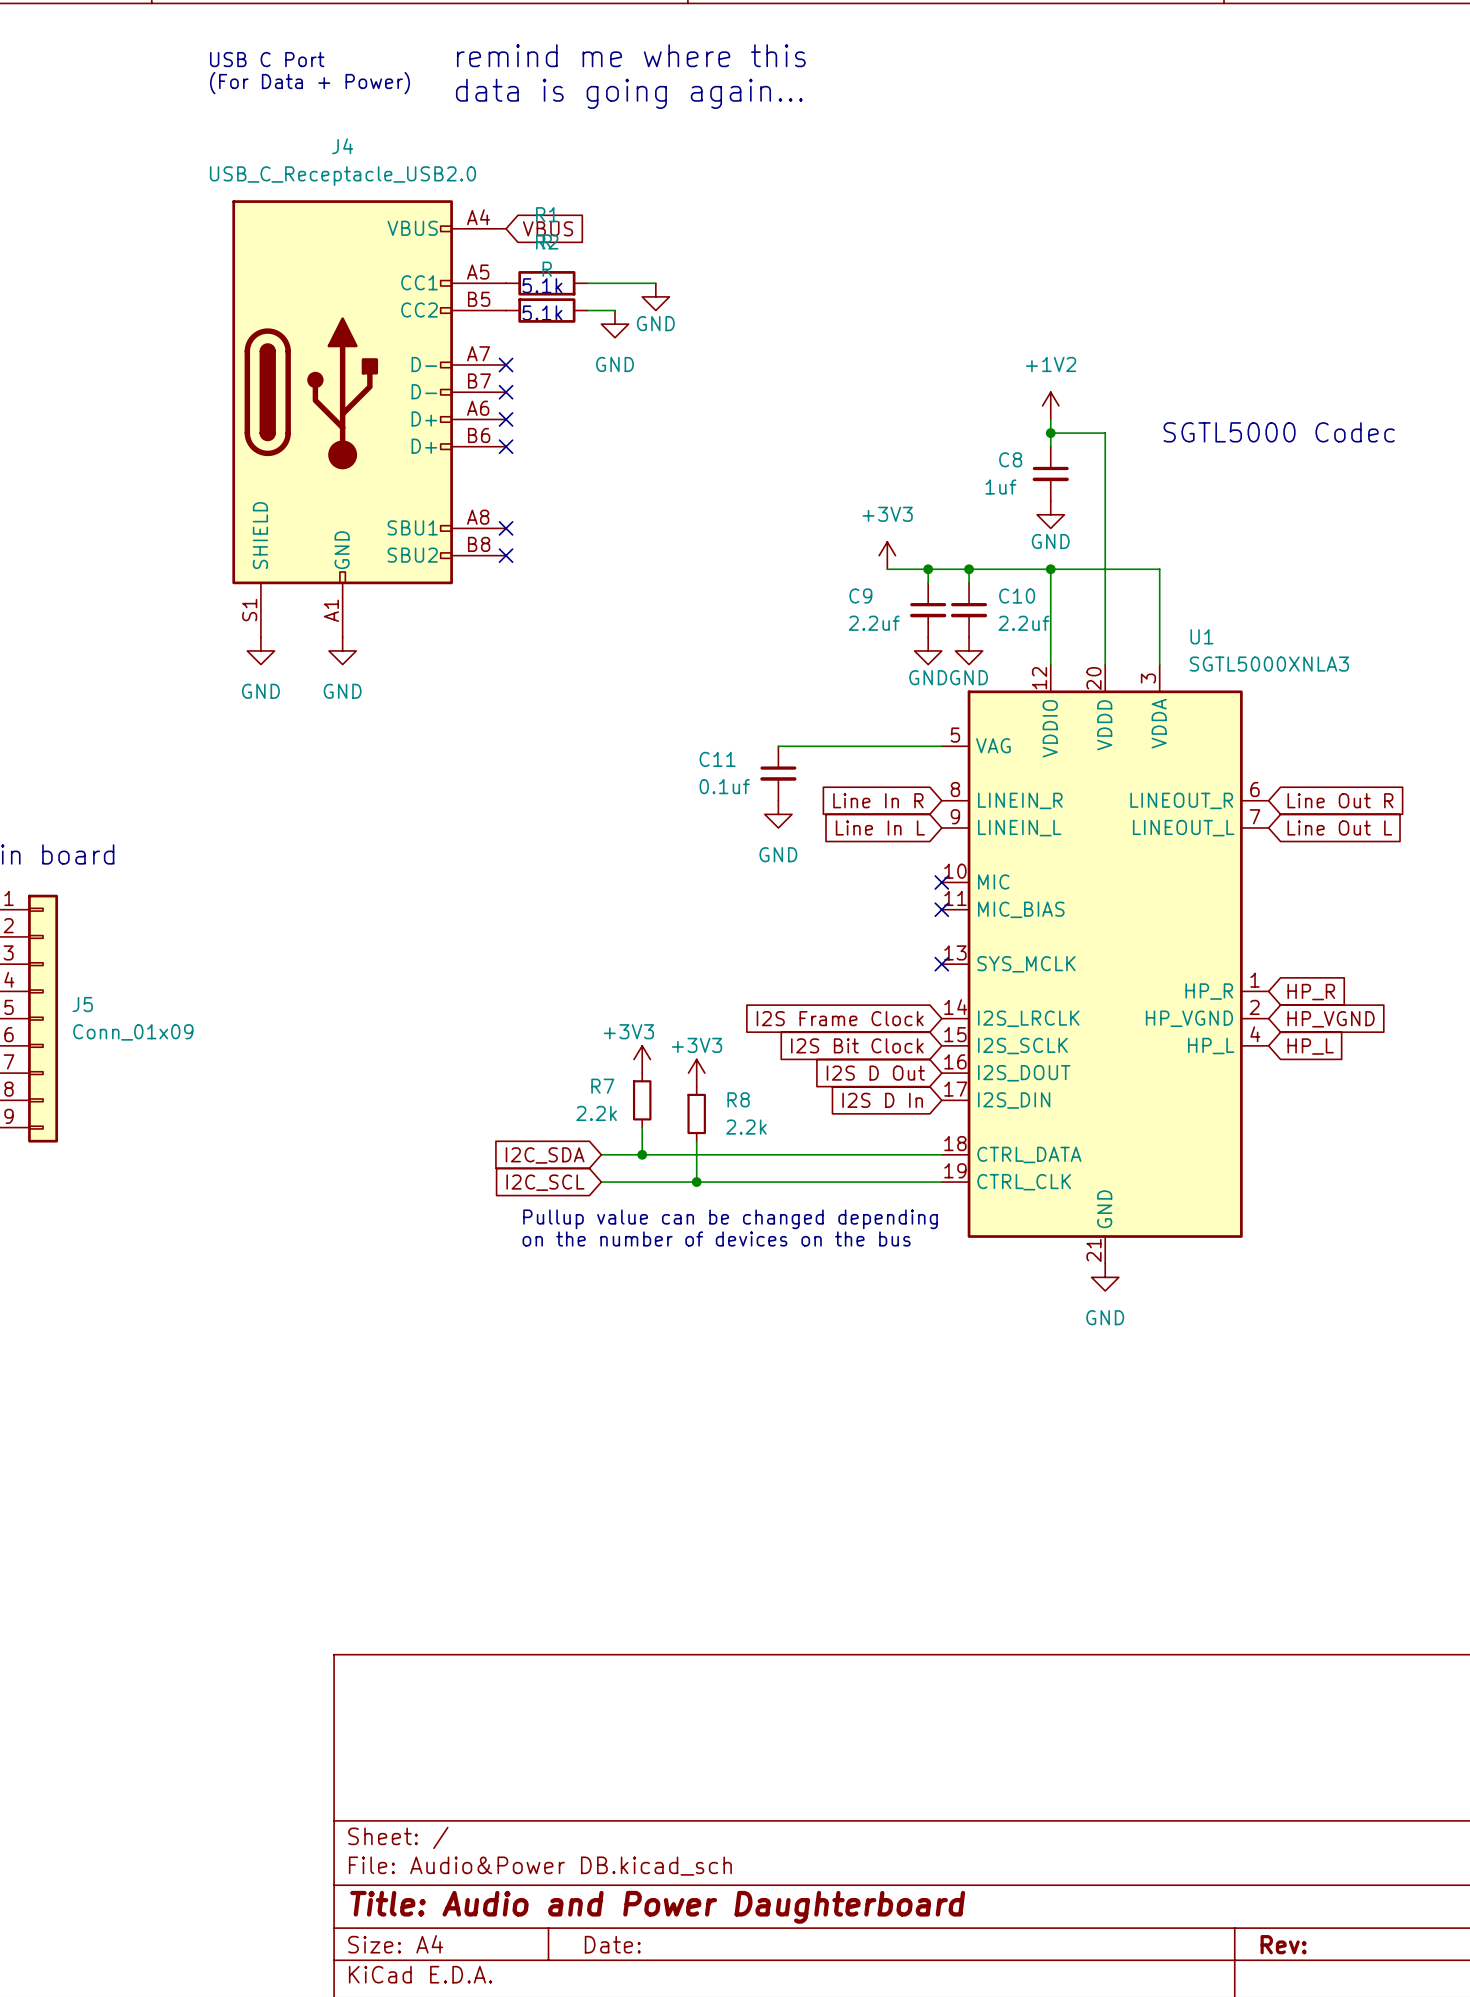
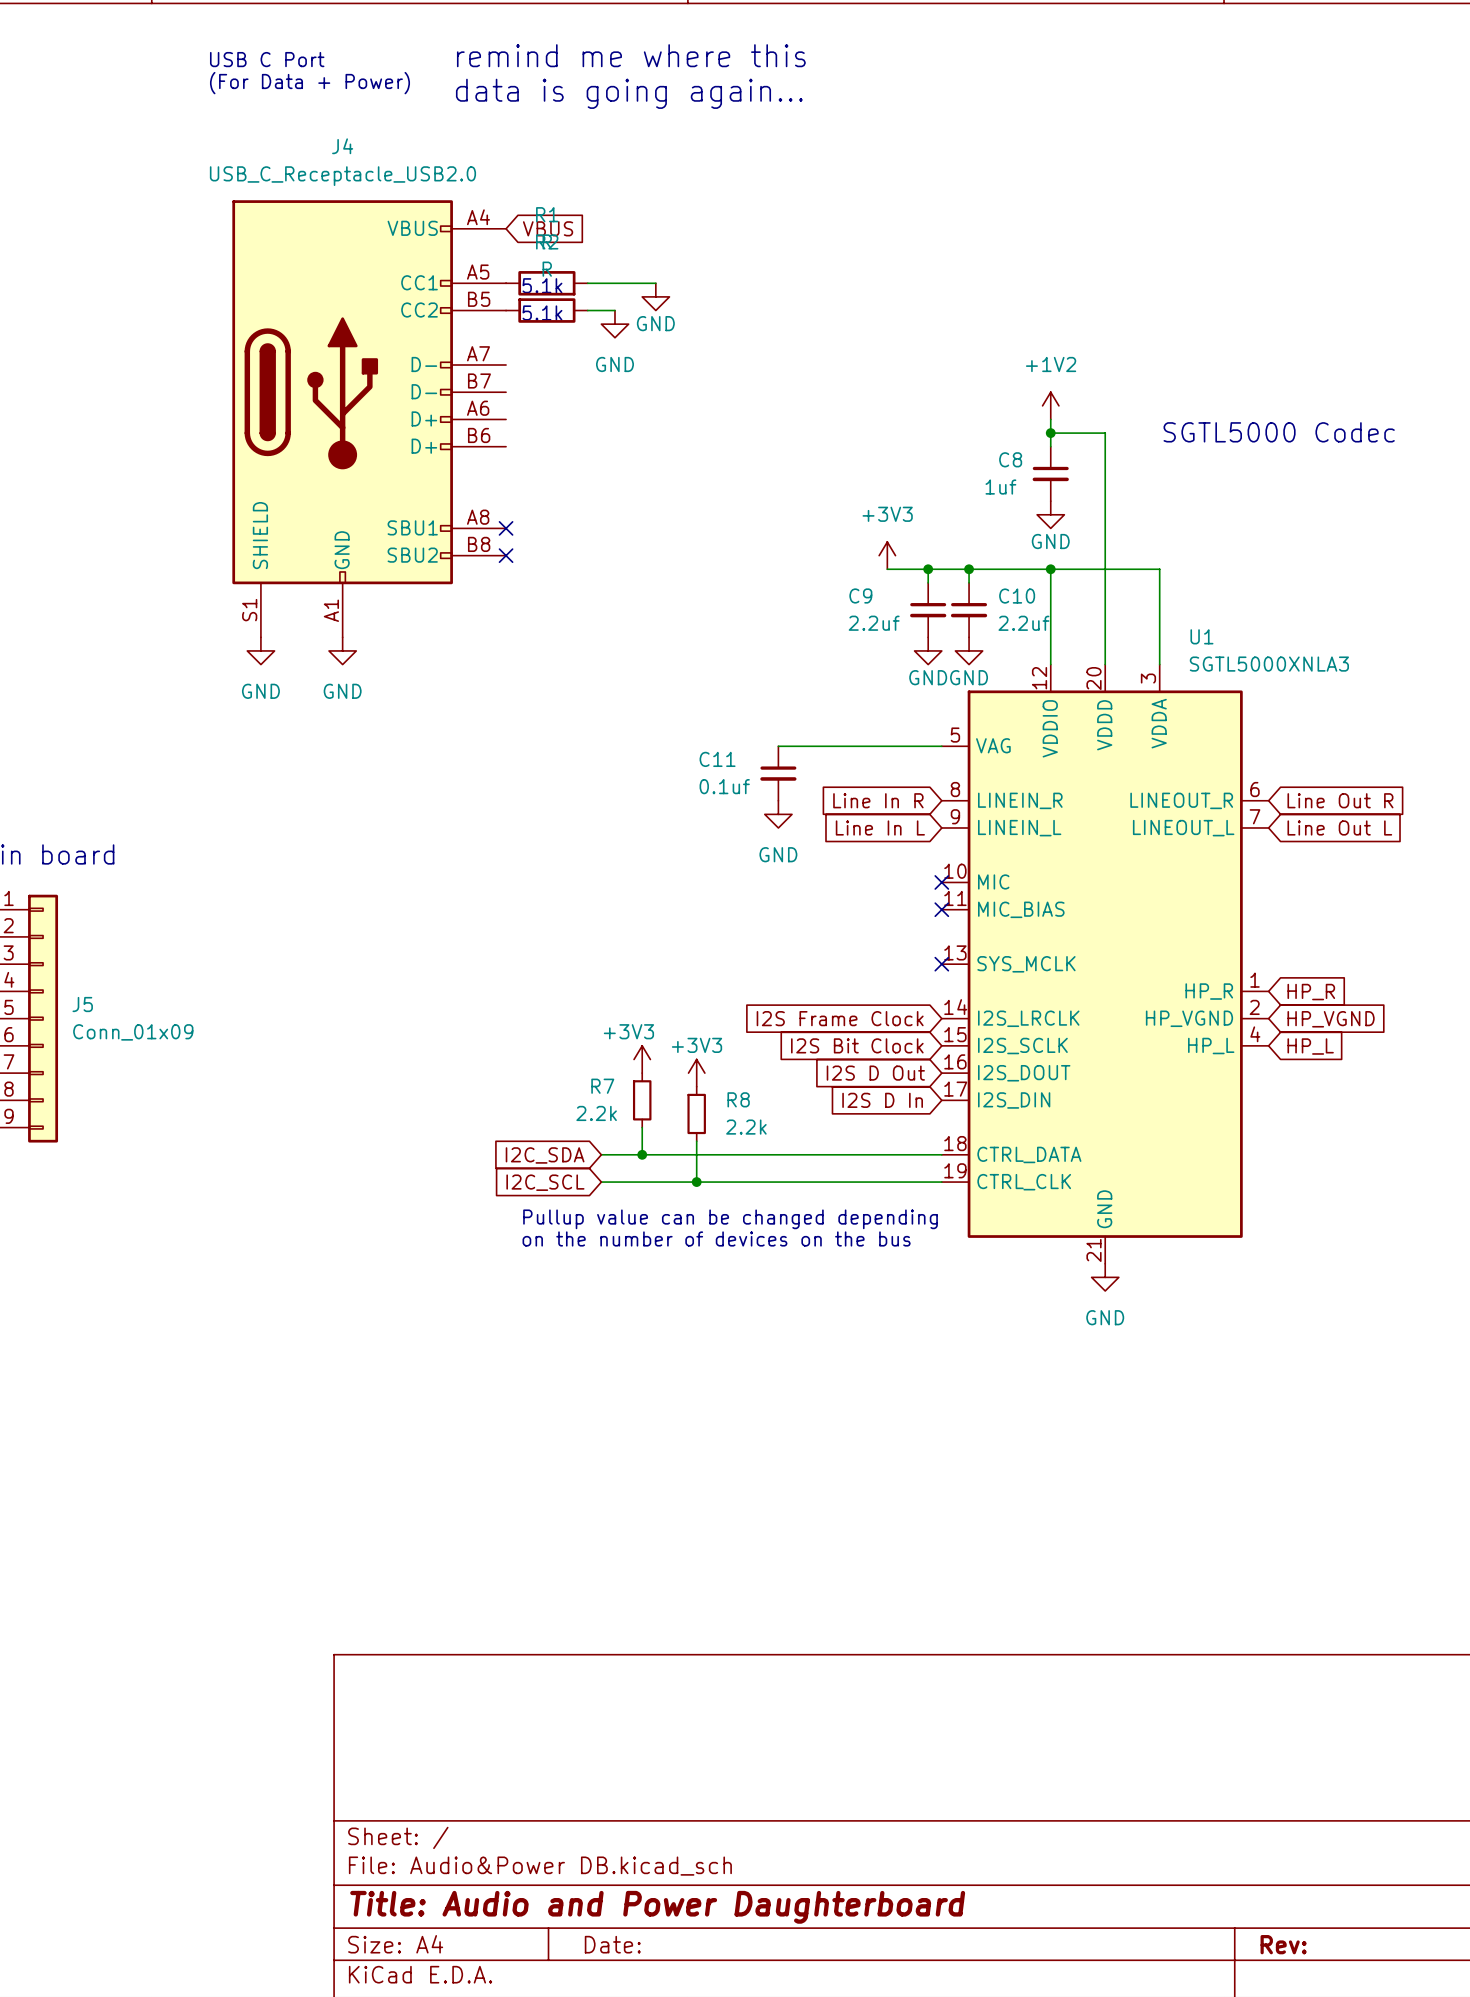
no-connect mark: (506, 364) -> none
no-connect mark: (506, 392) -> none
no-connect mark: (506, 419) -> none
no-connect mark: (506, 446) -> none

